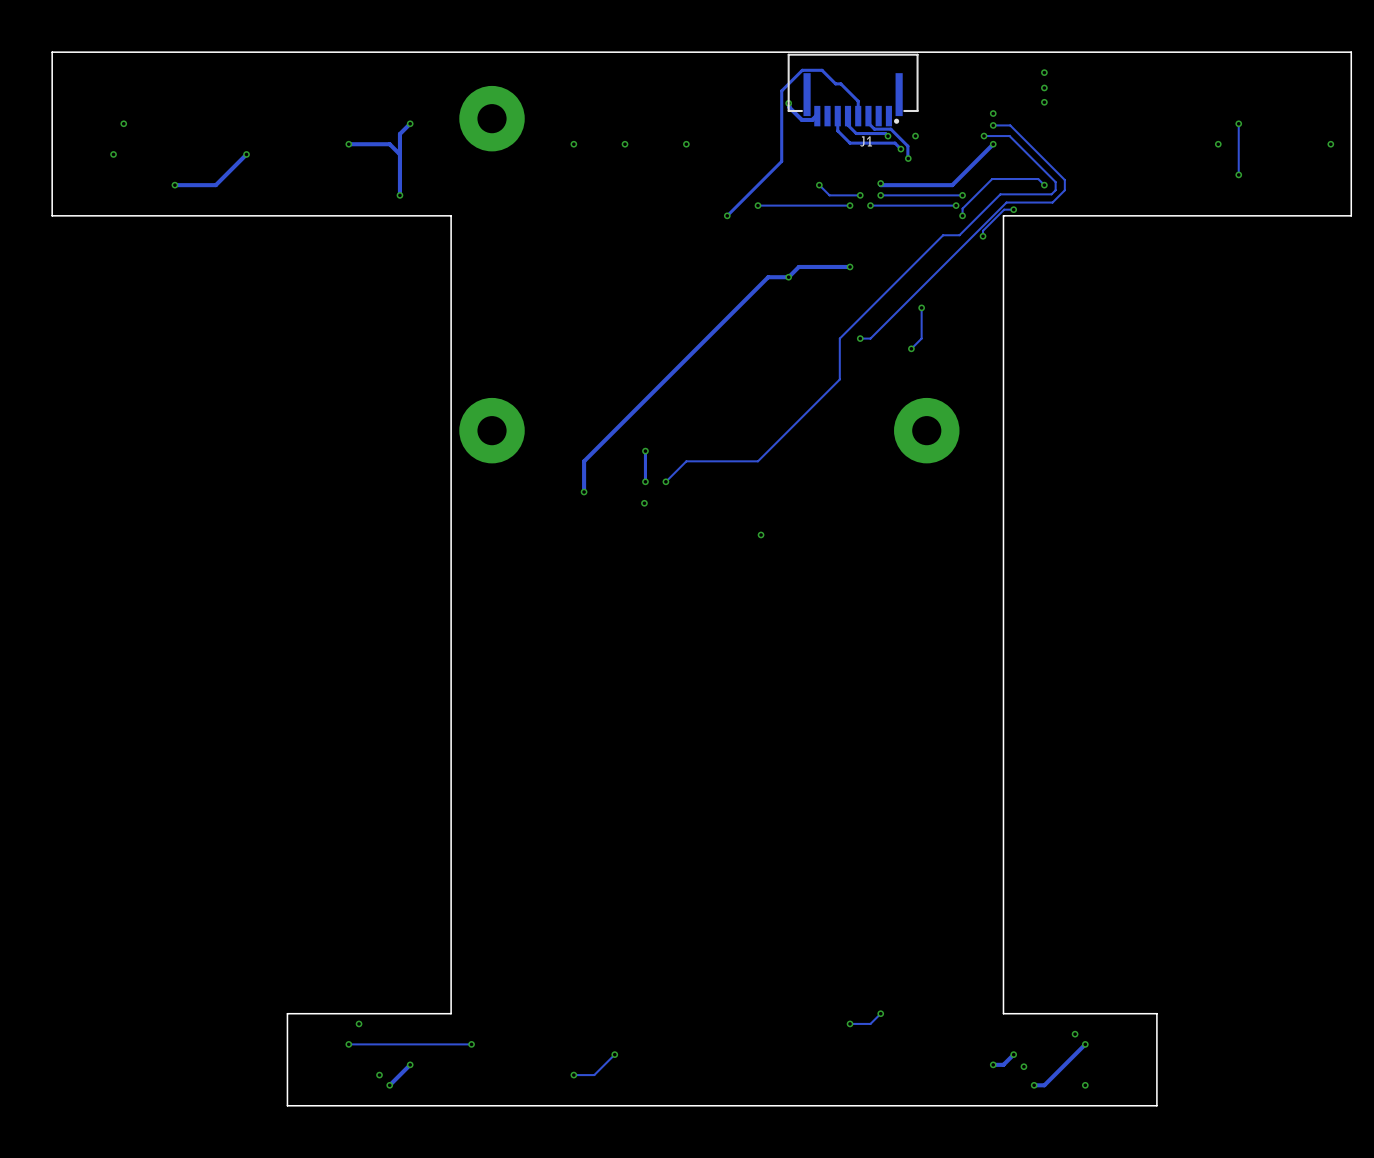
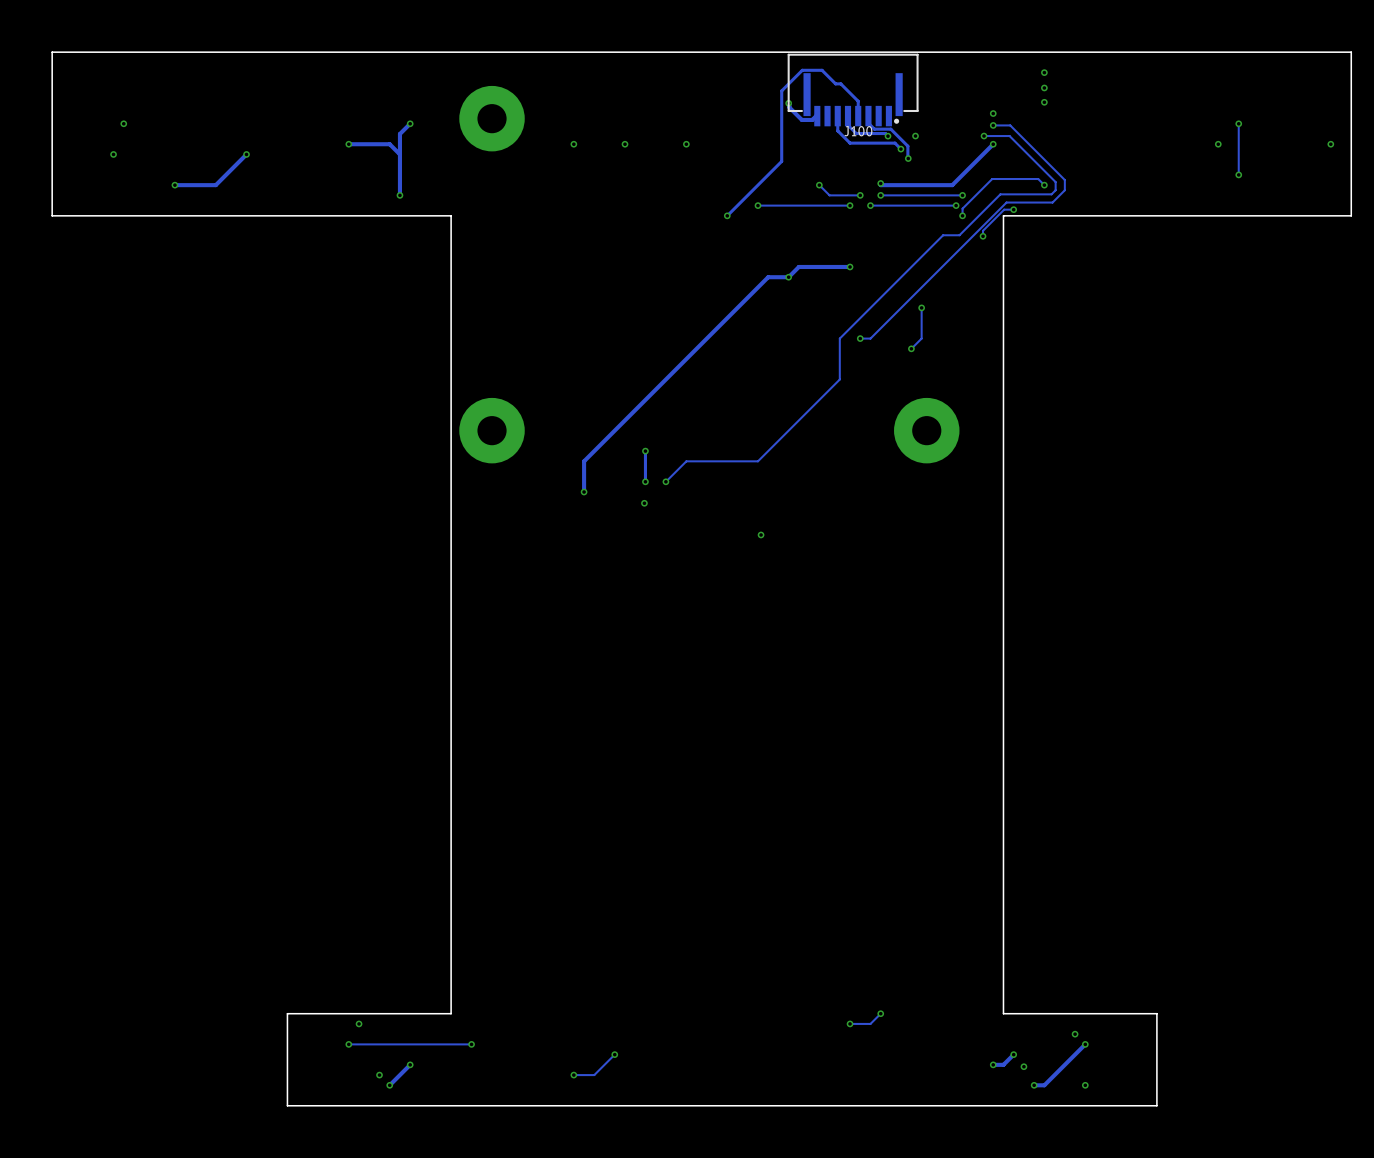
J1 name: J1 (866, 141) -> J100 (858, 131)

